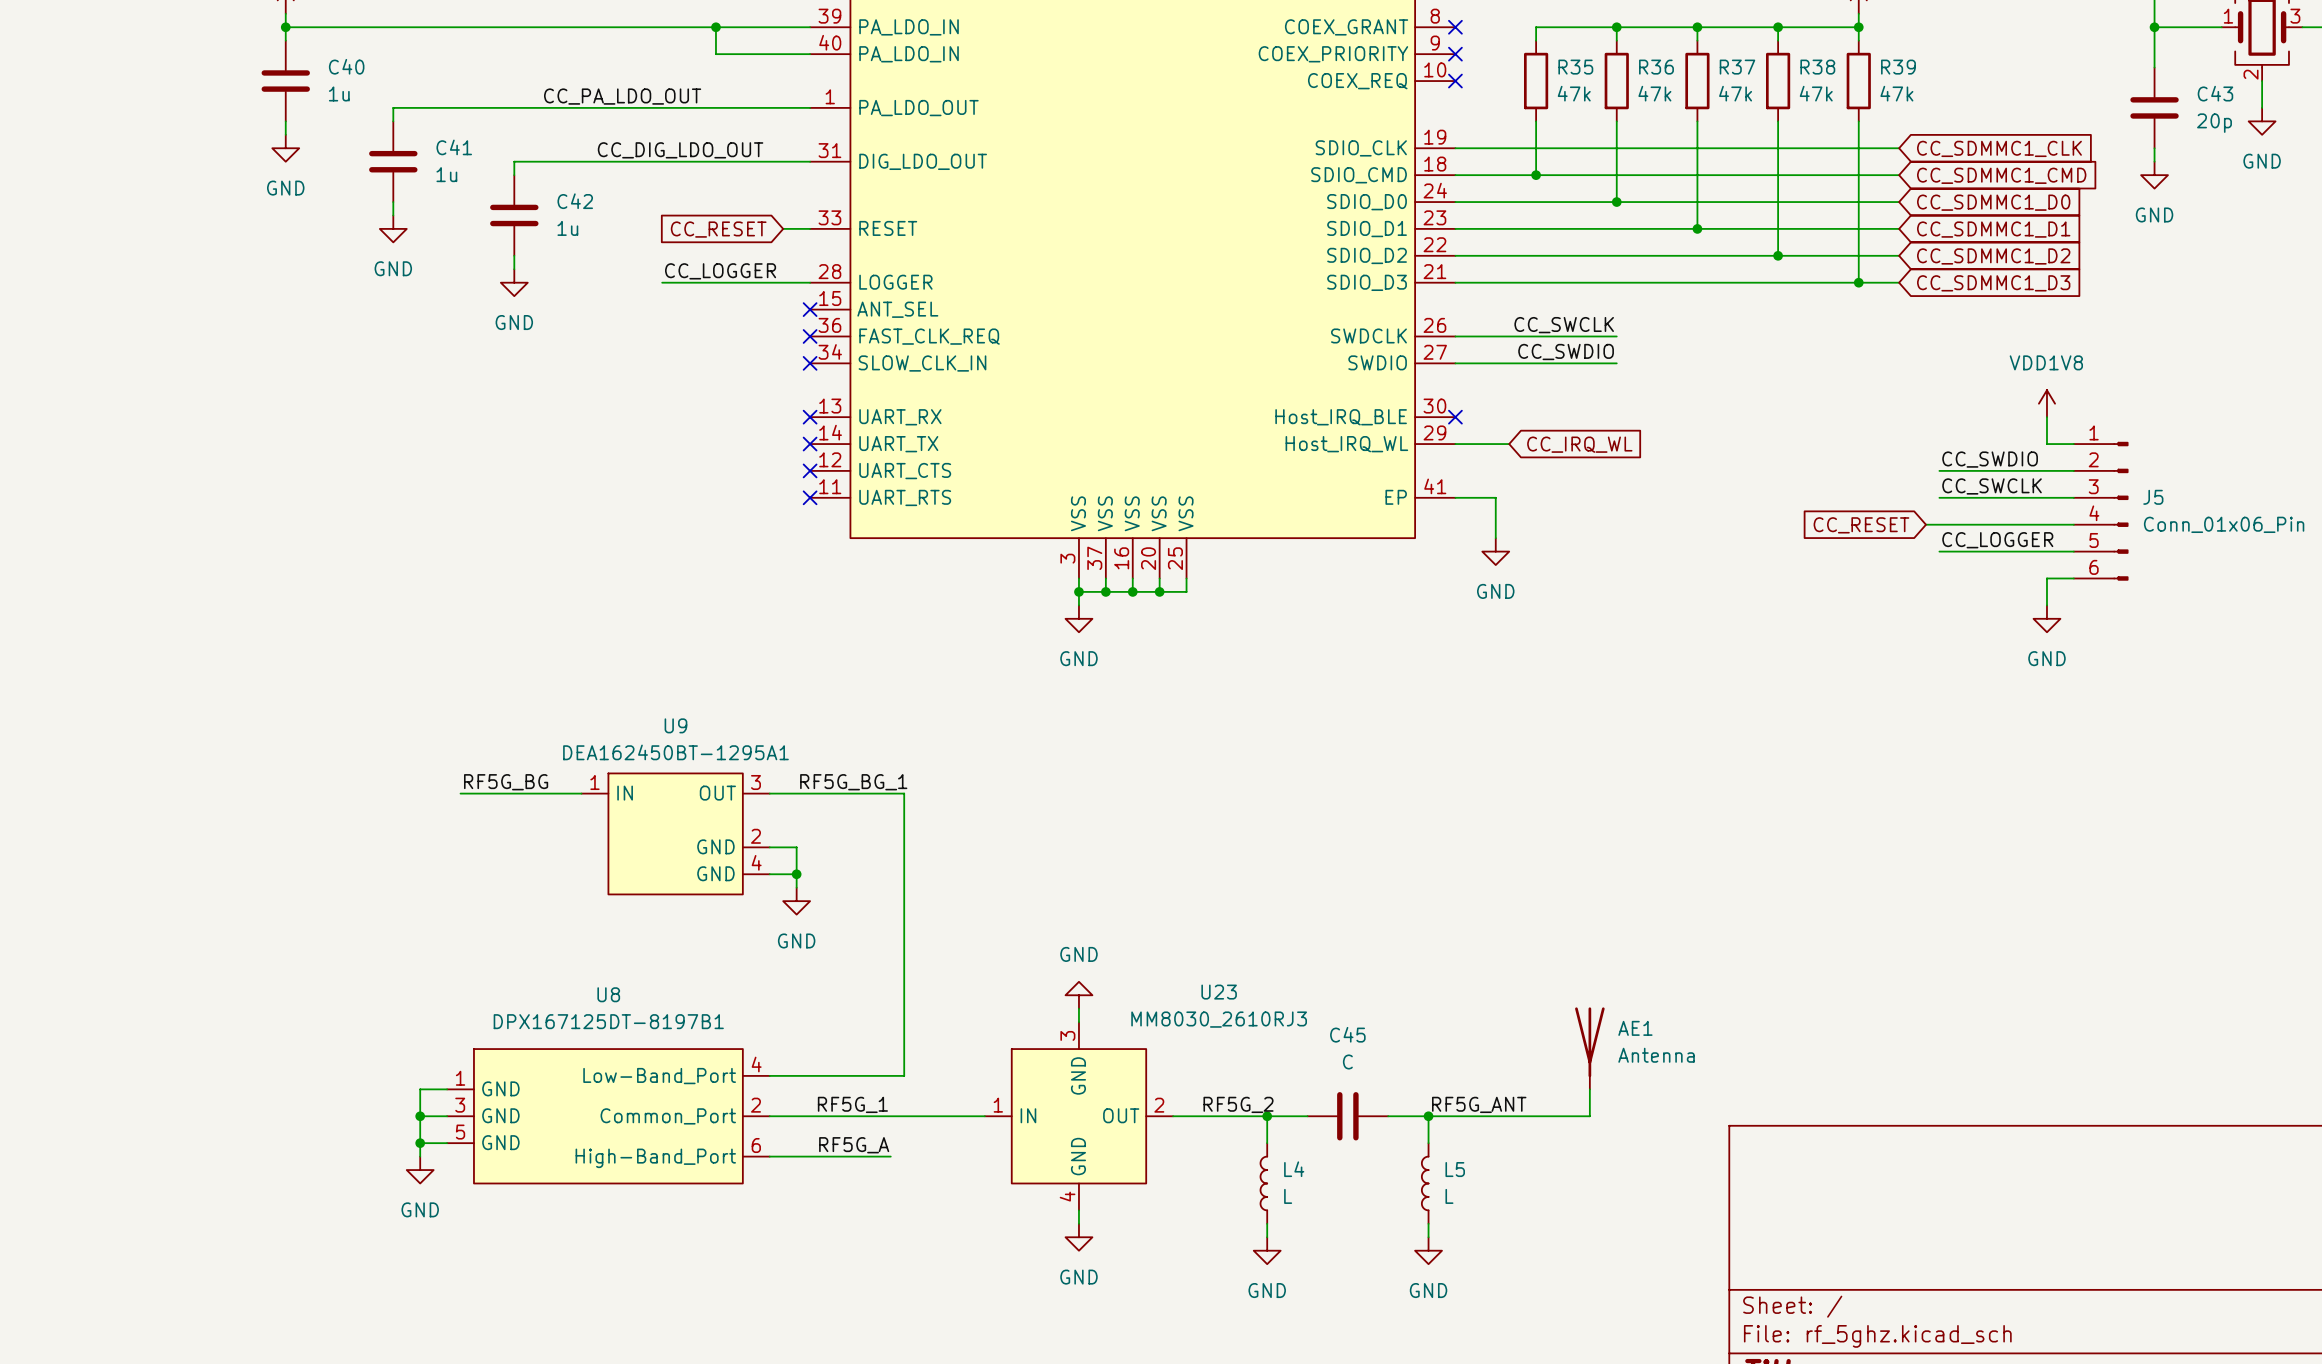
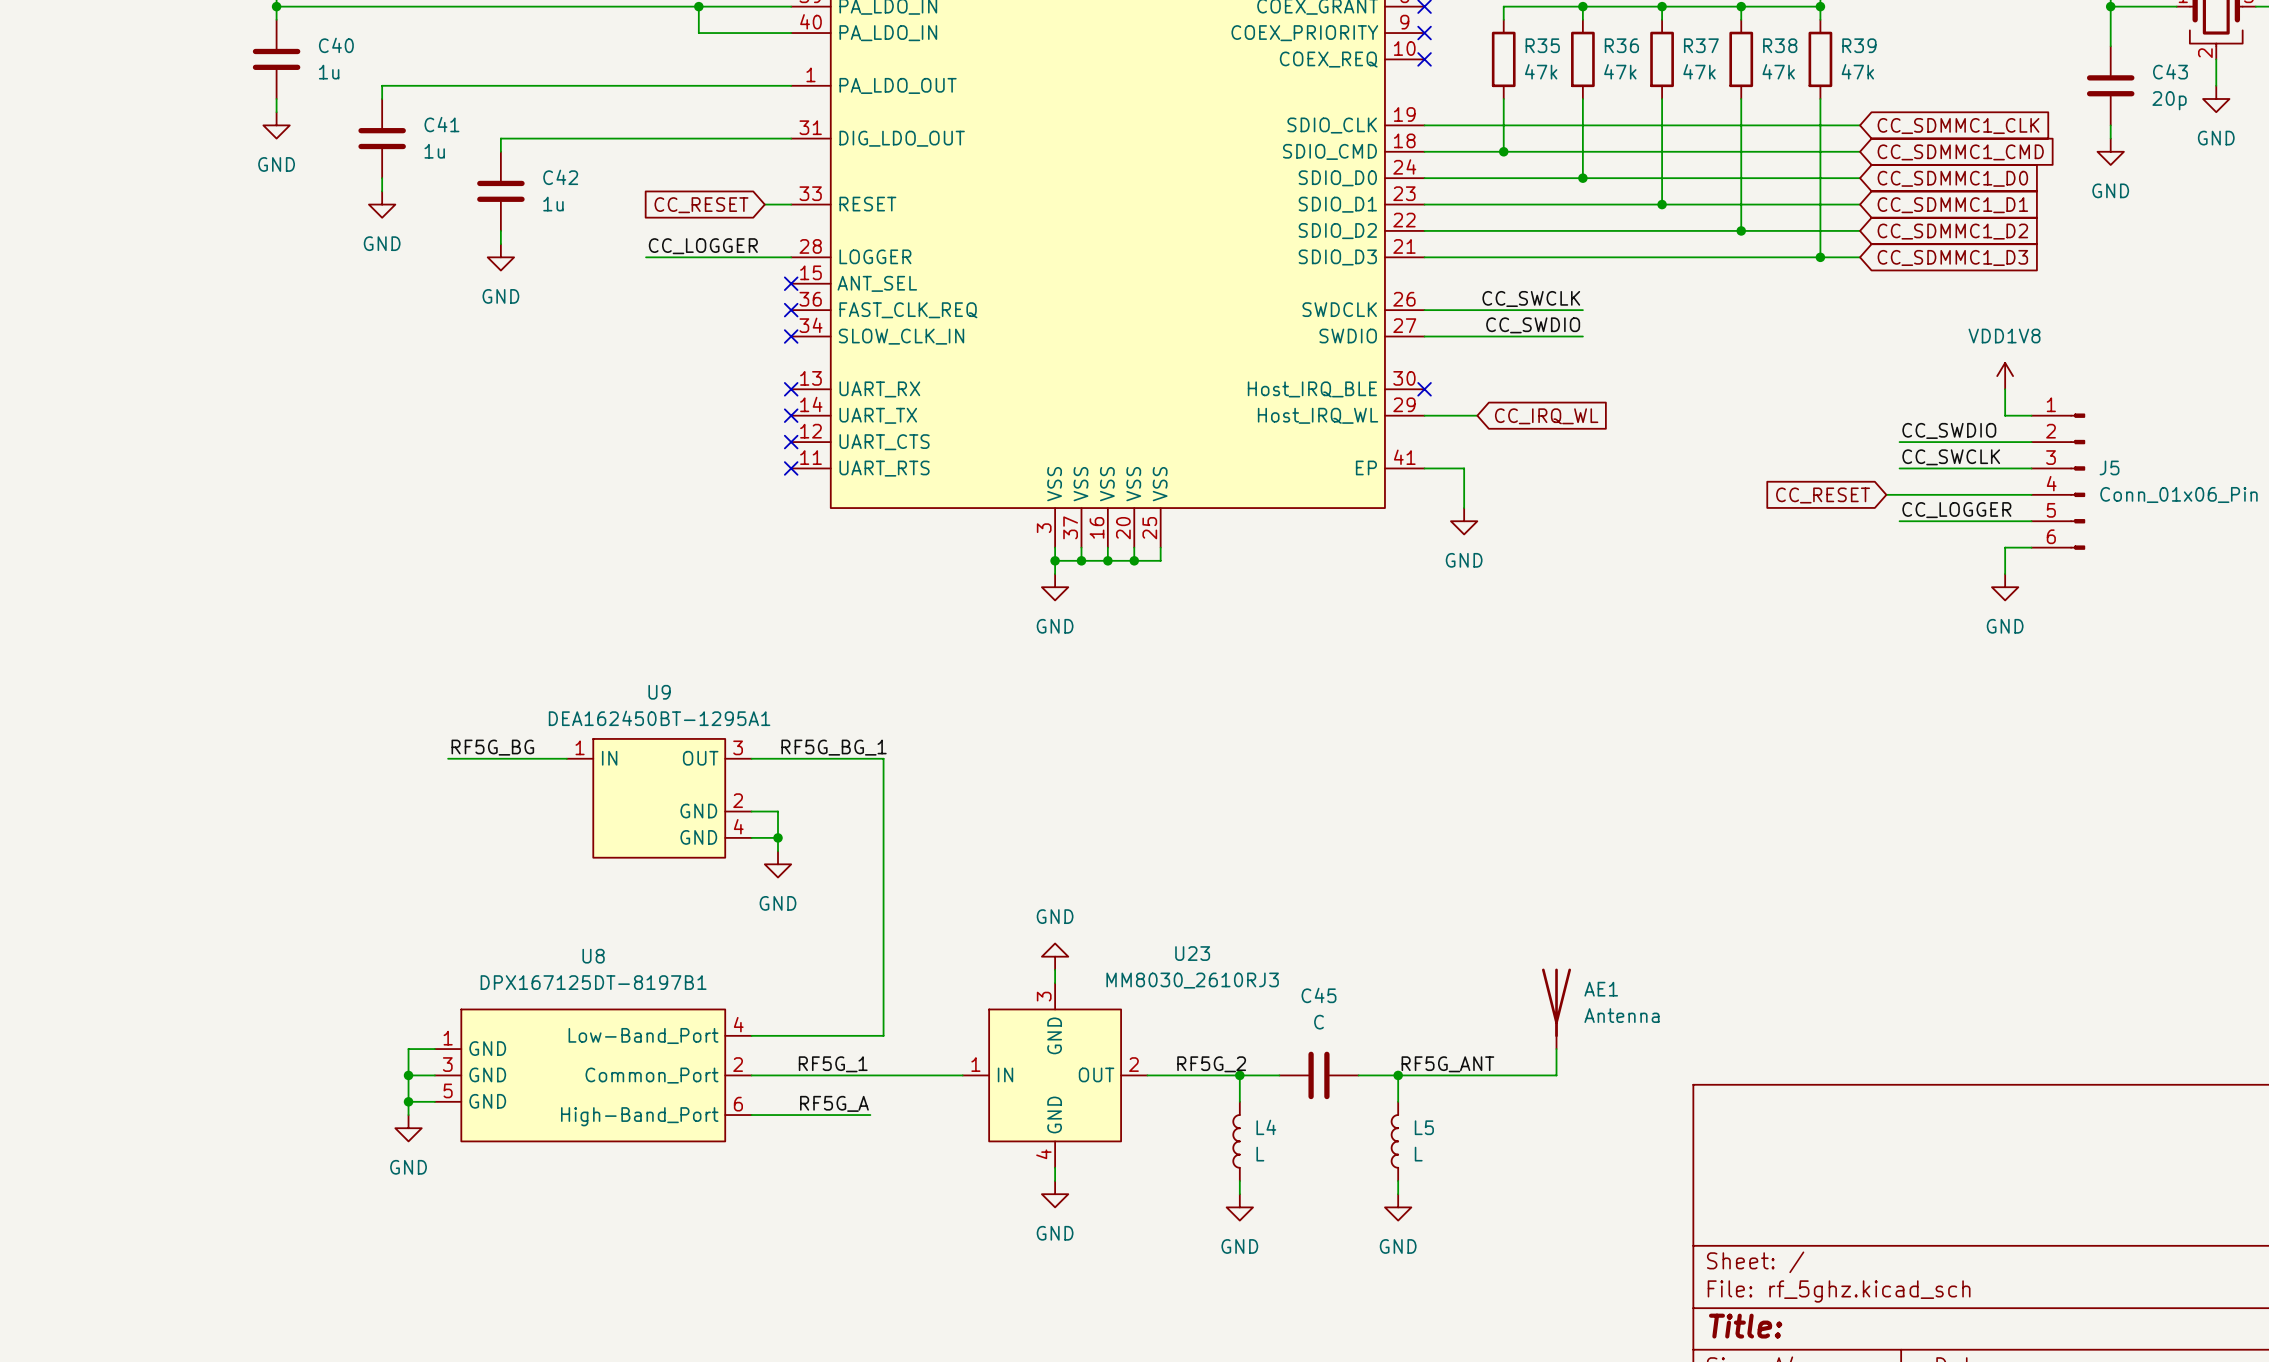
label: CC_PA_LDO_OUT (622, 96) -> none
label: CC_DIG_LDO_OUT (680, 150) -> none

